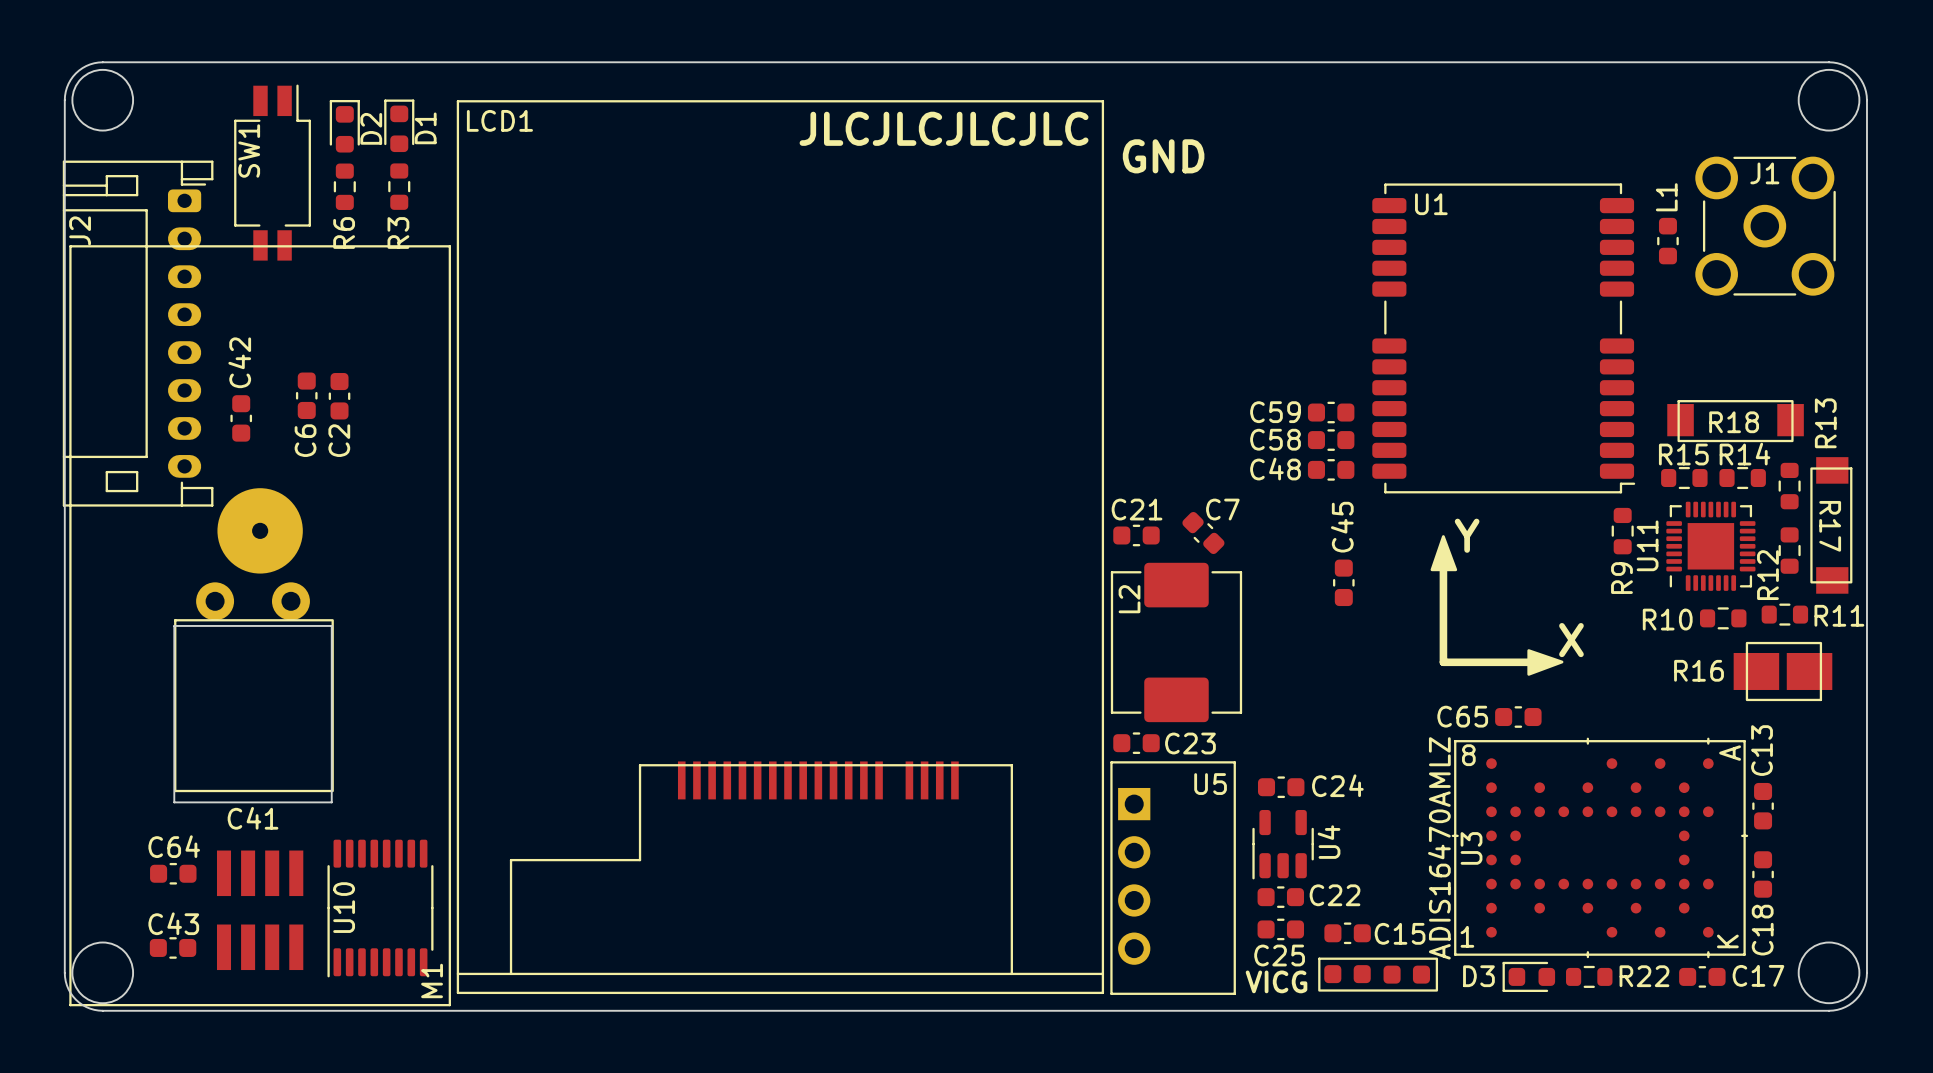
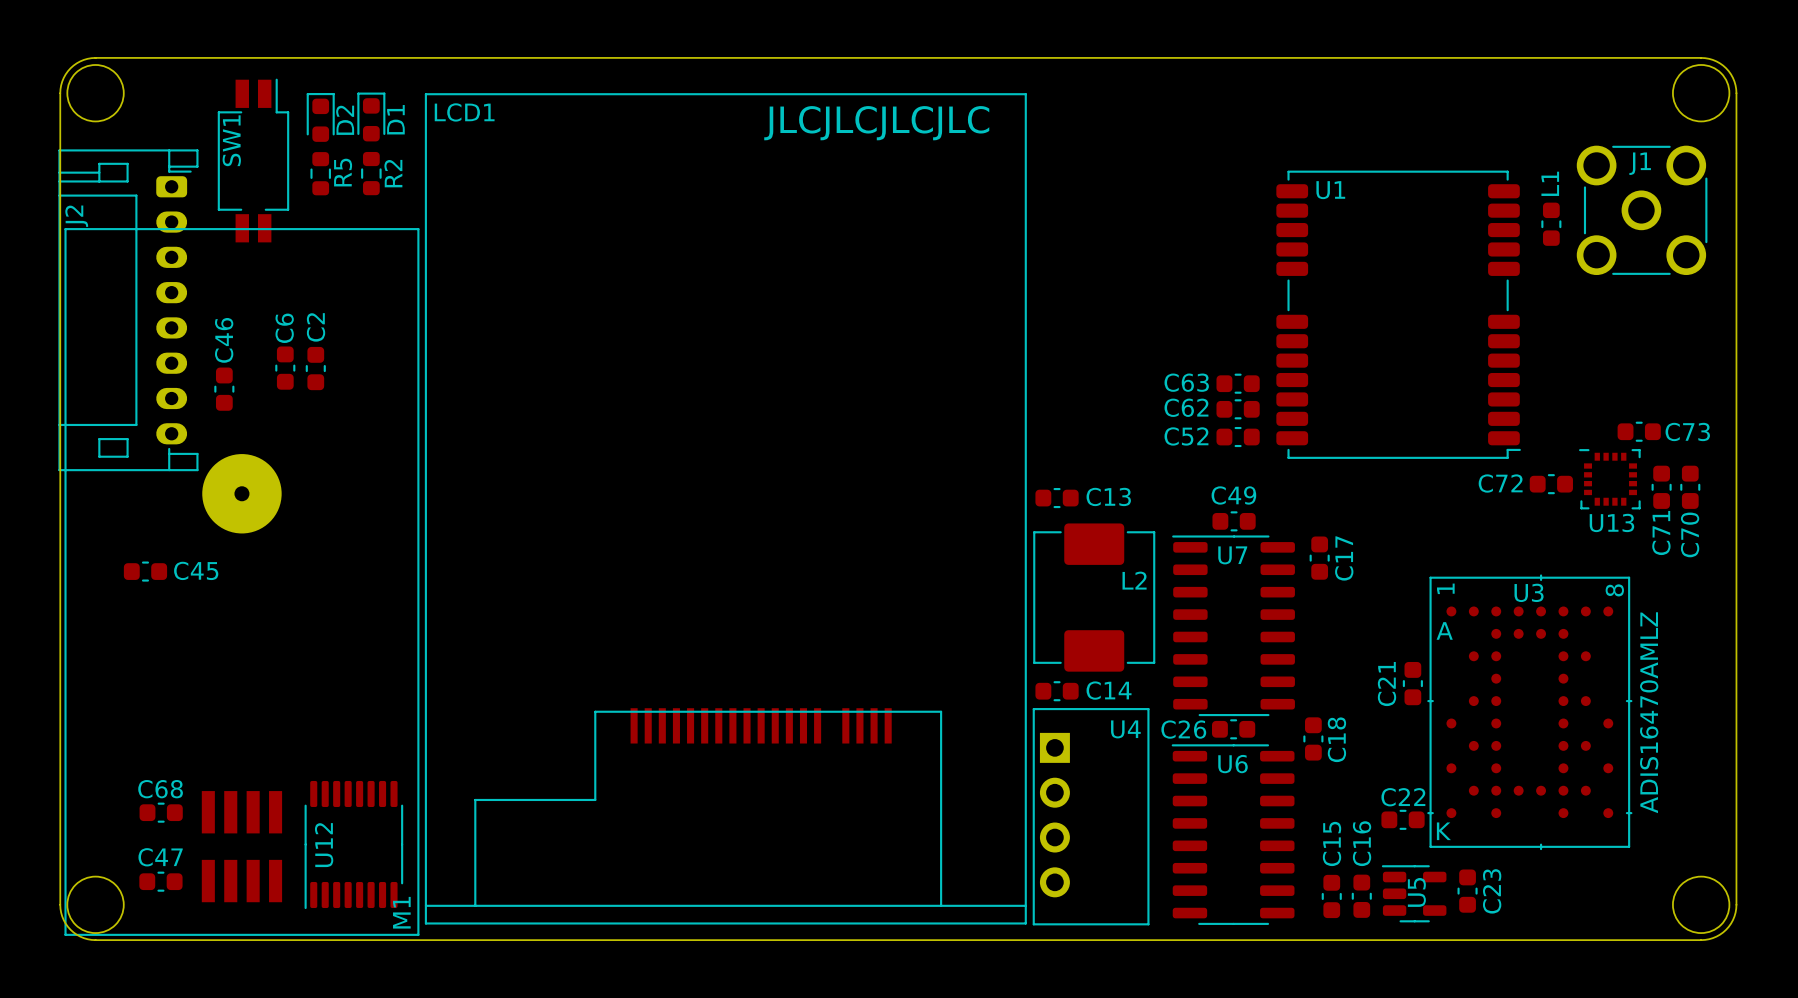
text: GND (1163, 156) -> none
R6 name: R6 (344, 233) -> R5 (343, 172)
R3 name: R3 (398, 233) -> R2 (393, 173)
C42 name: C42 (239, 362) -> C46 (224, 340)
C59 name: C59 (1275, 412) -> C63 (1186, 382)
R18: (1735, 421) -> none
C58 name: C58 (1275, 439) -> C62 (1186, 407)
C6 name position: C6 (305, 440) -> C6 (284, 328)
C2 name position: C2 (339, 440) -> C2 (316, 327)
C73: none -> (1639, 431)
C48 name: C48 (1275, 469) -> C52 (1186, 436)
R15: (1684, 477) -> none
R14: (1742, 477) -> none
R13: (1789, 486) -> none
C21 name: C21 (1137, 509) -> C13 (1108, 496)
U13: none -> (1609, 479)
C72: none -> (1551, 484)
C71: none -> (1661, 487)
C70: none -> (1690, 487)
R17: (1831, 525) -> none
R9: (1622, 531) -> none
C7: (1203, 533) -> none
drawing: [1430, 535, 1458, 572] -> none
text: Y (1467, 535) -> none
U11: (1710, 546) -> none
R12: (1789, 550) -> none
C49: none -> (1234, 521)
line: (1443, 569) (1443, 662) (1536, 662) -> none
C45 rotation: 0° (1343, 582) -> 90° clockwise (145, 571)
C45 position: (1343, 582) -> (145, 571)
L2 name rotation: 0° (1129, 599) -> 90° clockwise (1134, 580)
L2 name position: L2 (1129, 599) -> L2 (1134, 580)
R11: (1784, 614) -> none
R10: (1723, 618) -> none
board edge: (174, 625) (331, 625) (331, 802) (174, 802) (174, 625) -> none
text: X (1571, 640) -> none
drawing: [1527, 649, 1564, 676] -> none
R16: (1782, 671) -> none
U7: none -> (1233, 625)
C41: (253, 687) -> none
C65: (1518, 717) -> none
C21: none -> (1412, 683)
U3 footprint: [1451, 737, 1749, 959] -> [1427, 574, 1633, 851]
C23 name: C23 (1190, 743) -> C14 (1109, 690)
U5 name: U5 (1210, 784) -> U4 (1125, 729)
C26: none -> (1233, 729)
C24: (1281, 787) -> none
C13: (1763, 806) -> none
U4: (1283, 844) -> none
C64 name: C64 (174, 846) -> C68 (160, 789)
U3 value position: ADIS16470AMLZ (1439, 848) -> ADIS16470AMLZ (1649, 712)
U3 name position: U3 (1471, 848) -> U3 (1529, 592)
C18 position: (1763, 874) -> (1313, 738)
C22 name position: C22 (1335, 895) -> C22 (1403, 797)
C22 position: (1280, 897) -> (1403, 819)
U6: none -> (1233, 834)
U10 name: U10 (344, 907) -> U12 (324, 845)
C43 name: C43 (173, 923) -> C47 (160, 857)
C25: (1280, 929) -> none
C18 name position: C18 (1762, 930) -> C18 (1336, 739)
C15 rotation: 0° (1347, 933) -> 90° clockwise (1331, 896)
C15 position: (1347, 933) -> (1331, 896)
C15 name position: C15 (1400, 933) -> C15 (1332, 843)
C23: none -> (1467, 891)
U5: none -> (1414, 893)
C16: none -> (1361, 896)
part: (1378, 974) -> none
D3: (1528, 976) -> none
R22: (1589, 976) -> none
C17 rotation: 0° (1702, 976) -> 90° clockwise (1319, 558)
C17 position: (1702, 976) -> (1319, 558)
text: VICG (1276, 981) -> none

